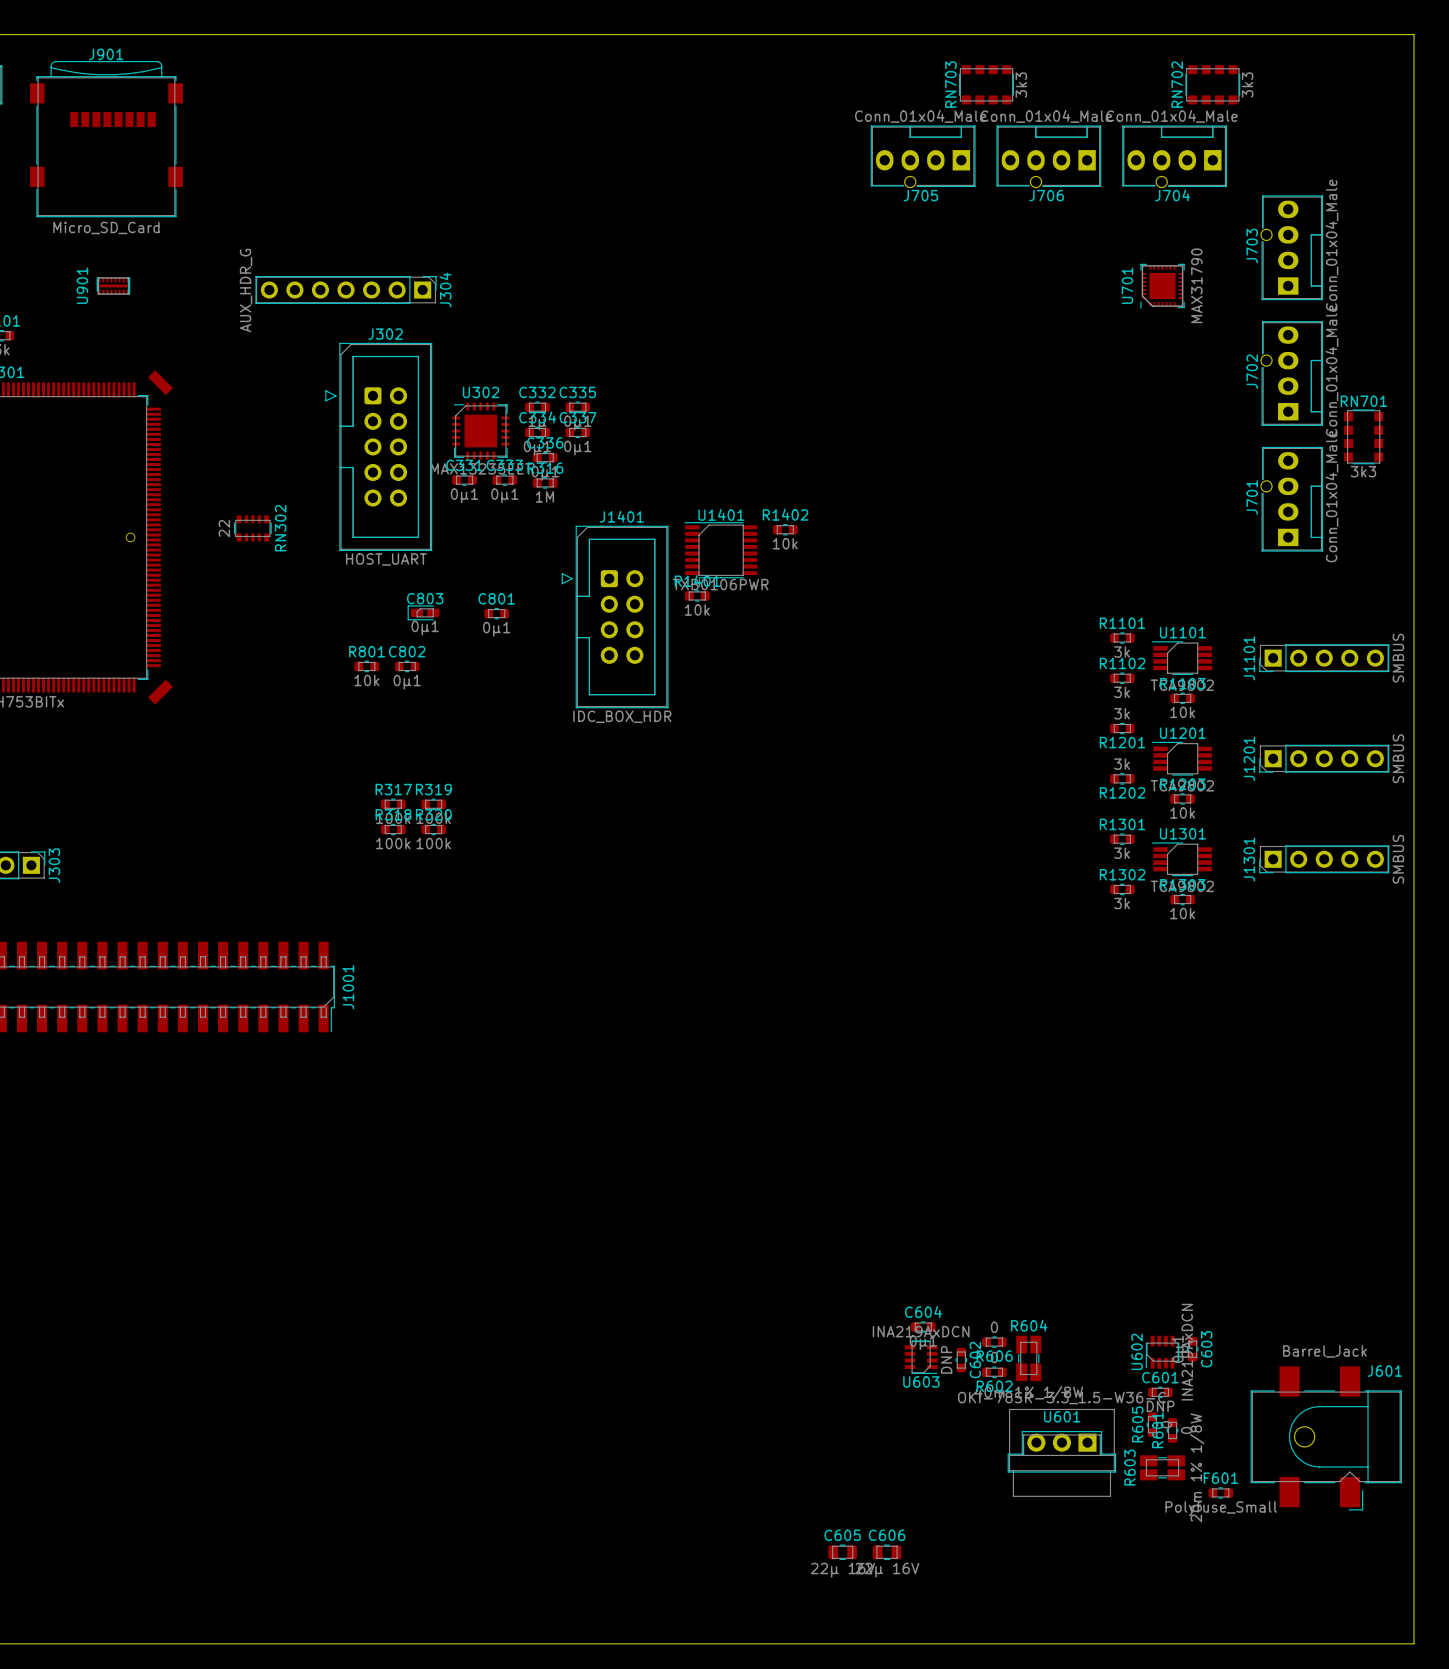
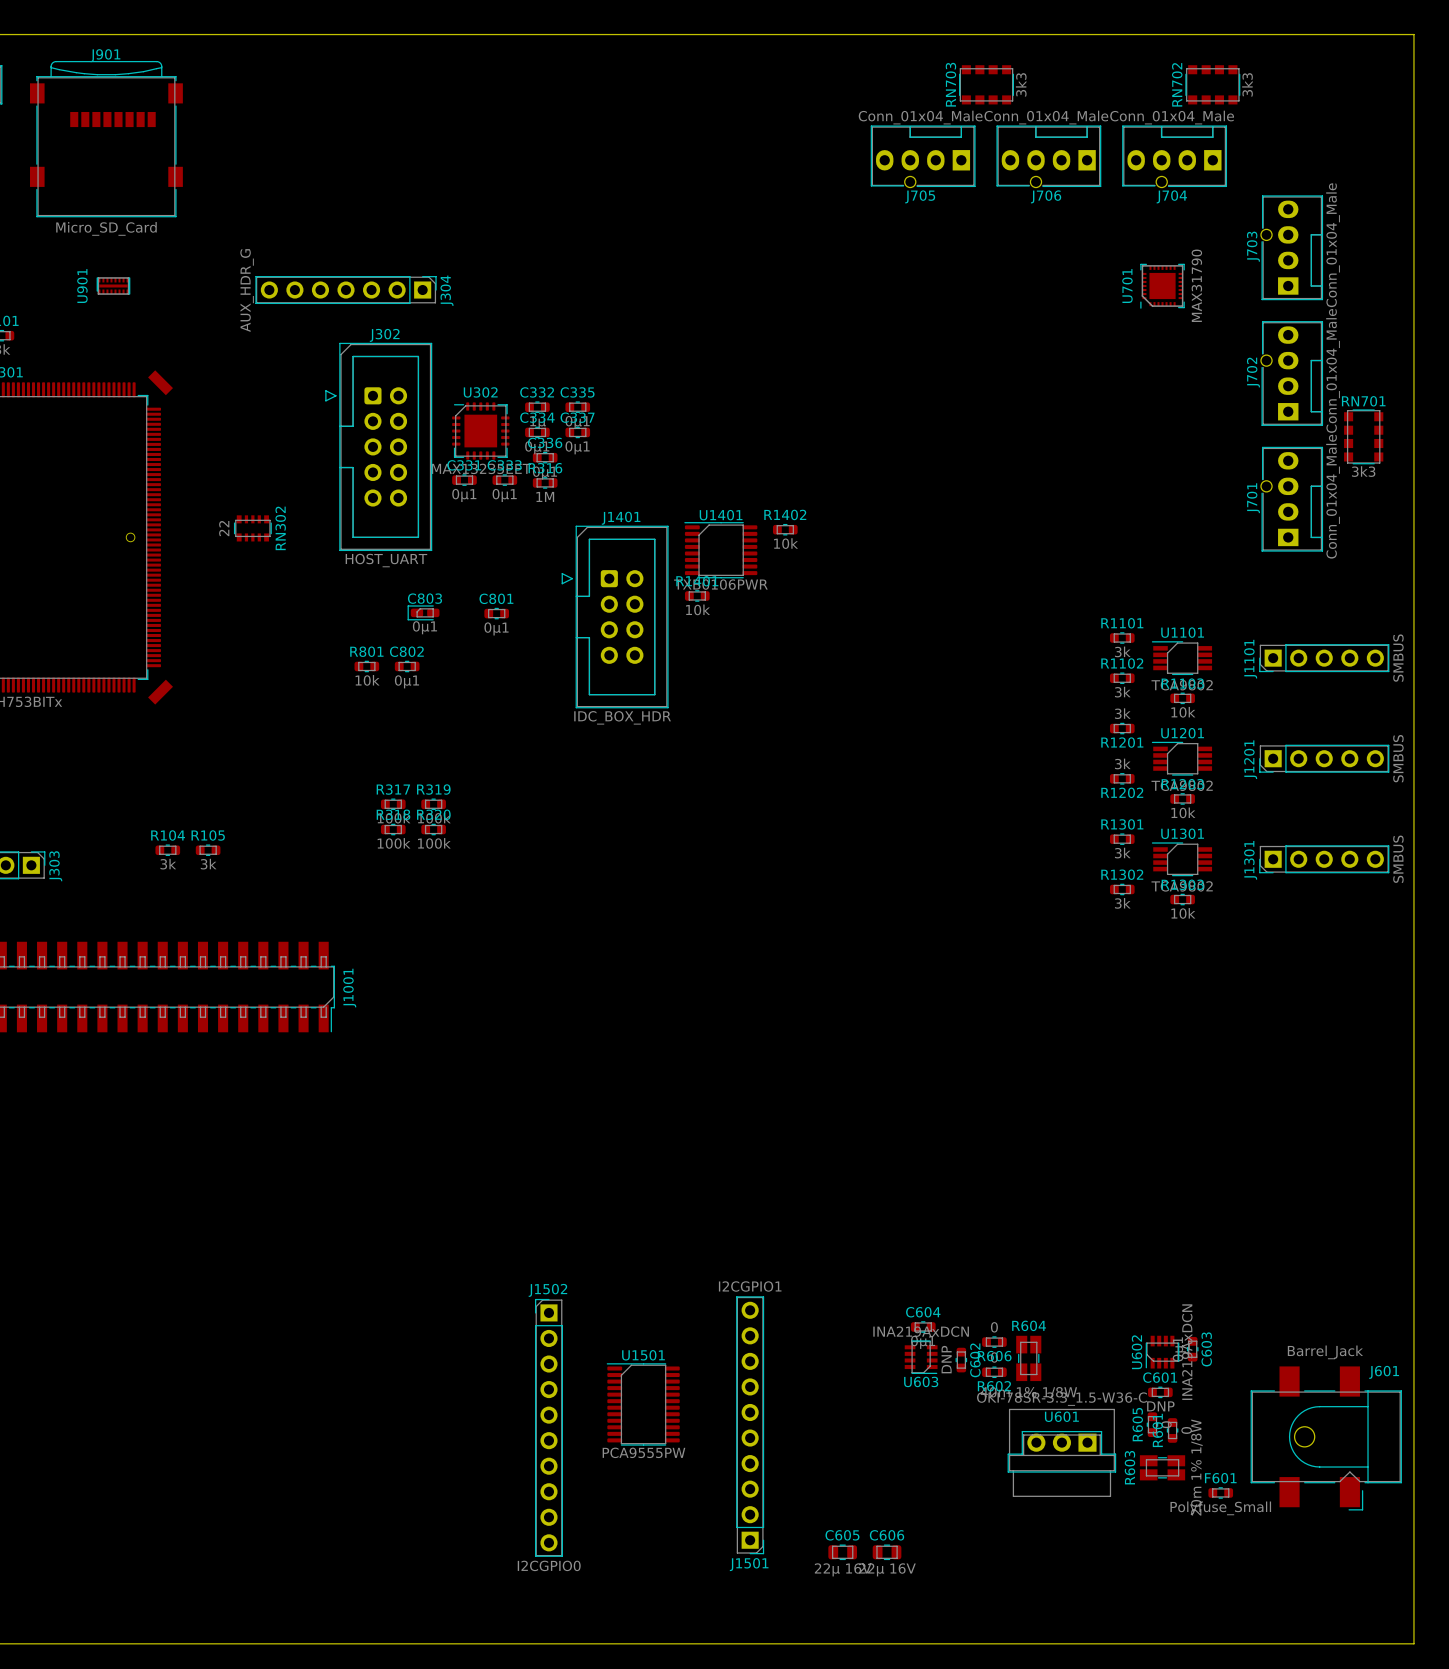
R104: none -> 3k (167, 850)
R105: none -> 3k (208, 850)
U1501: none -> PCA9555PW (643, 1404)
J1501: none -> I2CGPIO1 (750, 1425)
J1502: none -> I2CGPIO0 (548, 1427)

